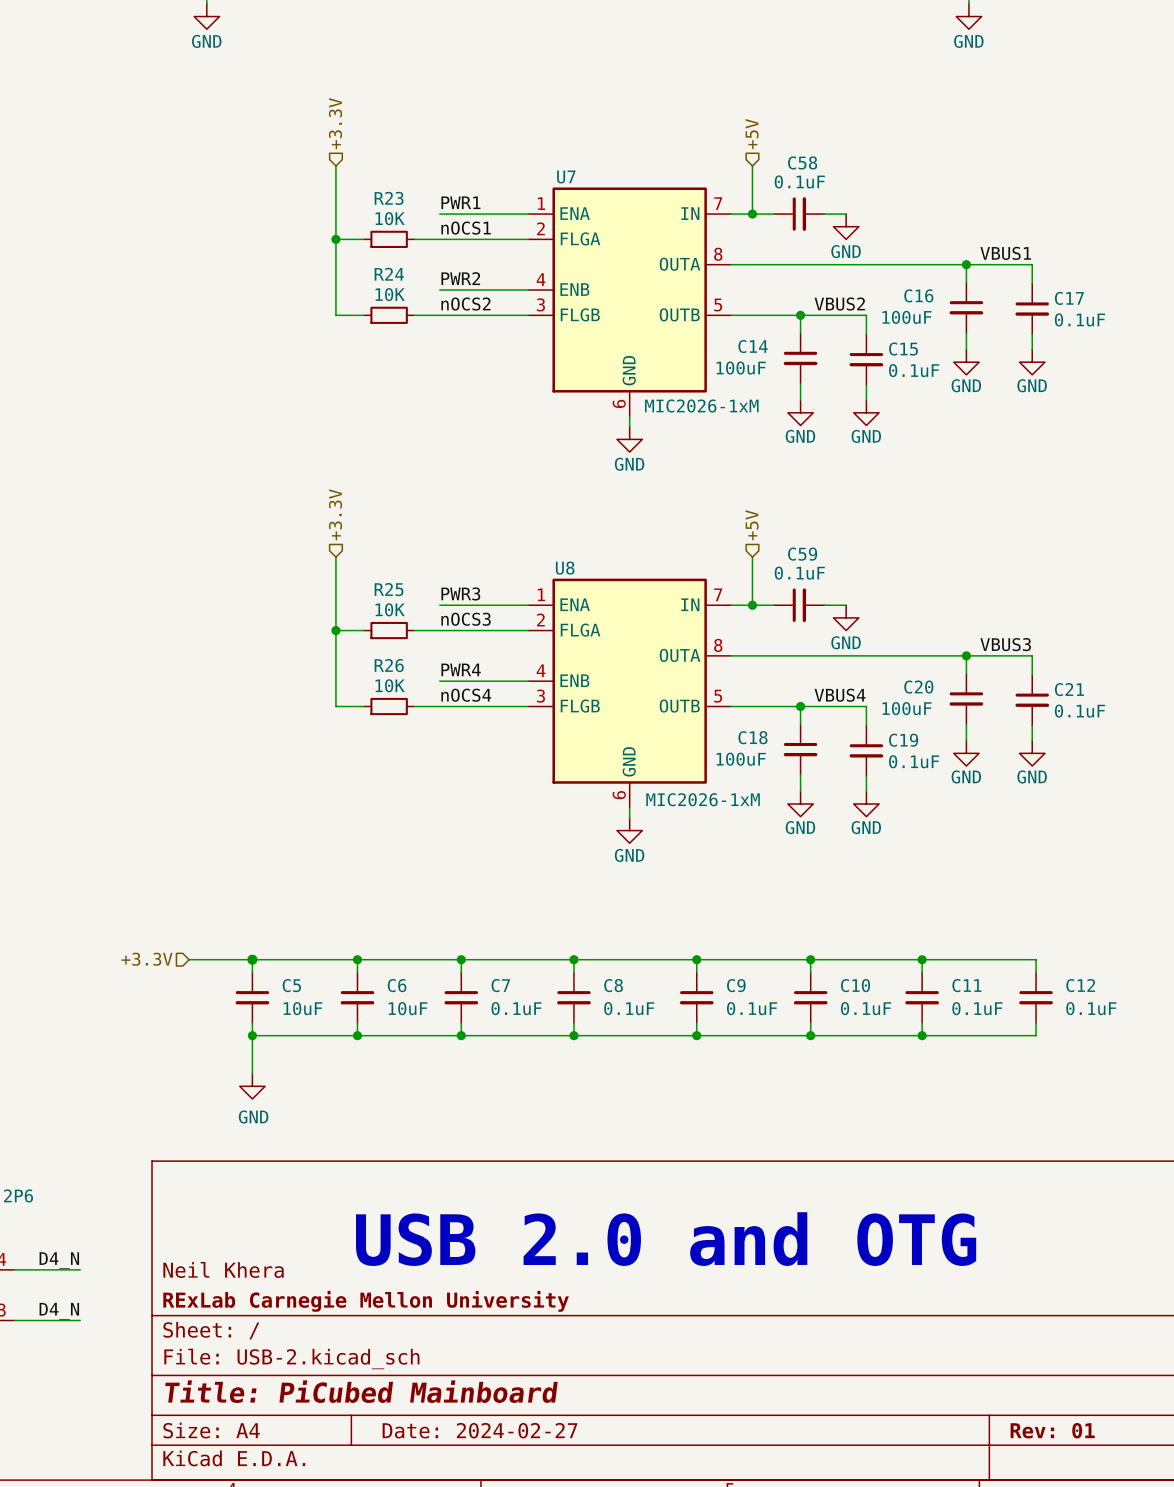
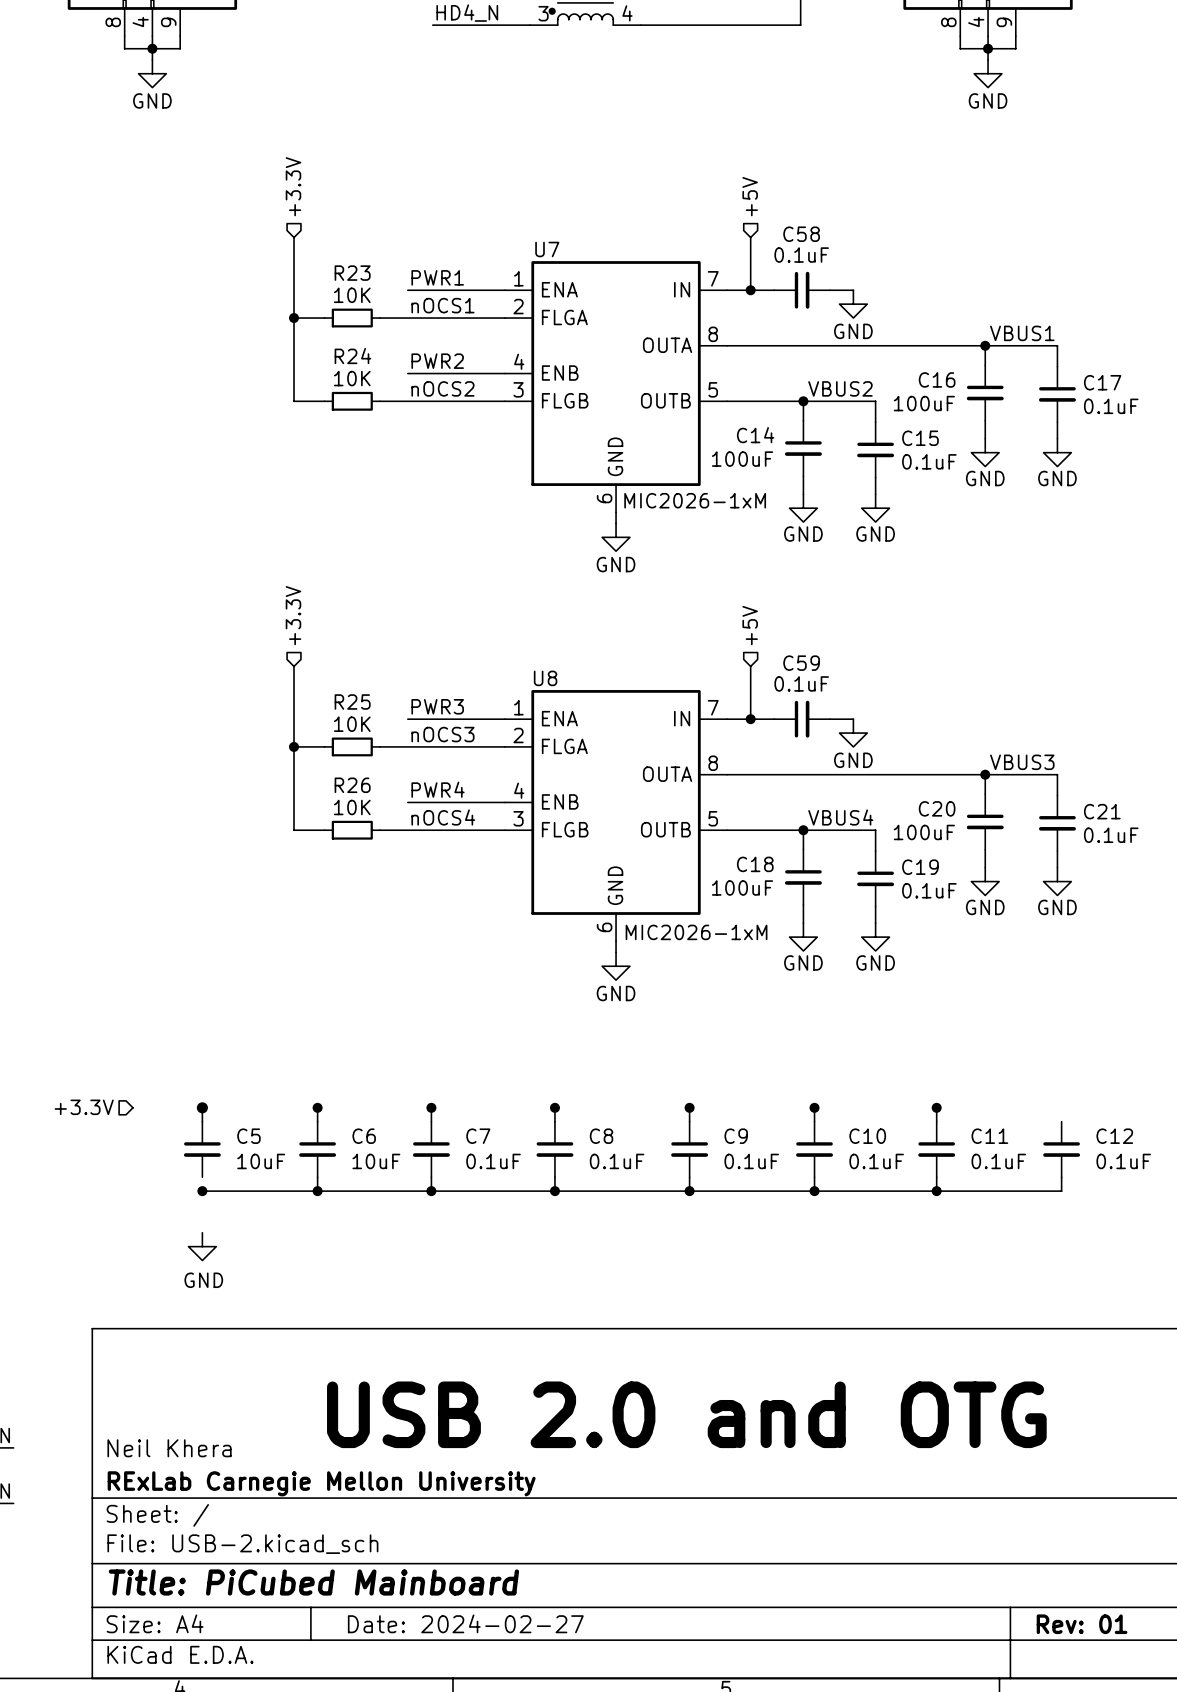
wire: (189, 959) (1036, 959) (1036, 972) -> none
wire: (252, 1023) (252, 1073) -> none

